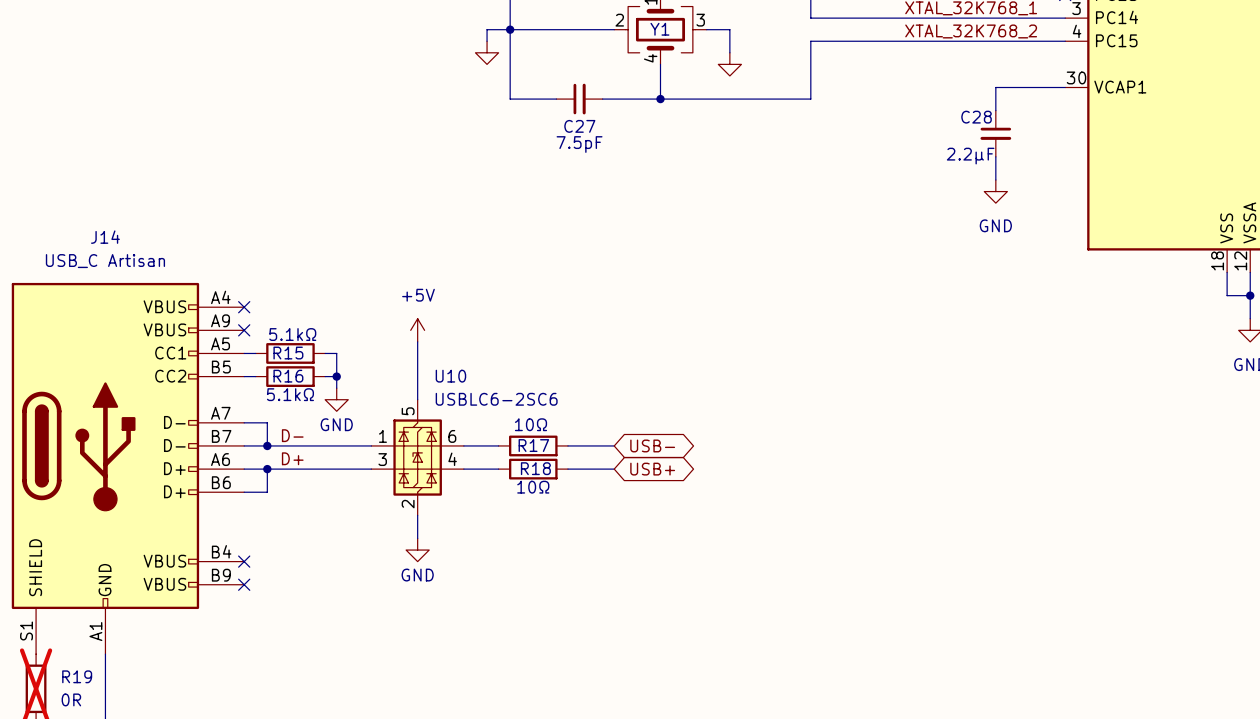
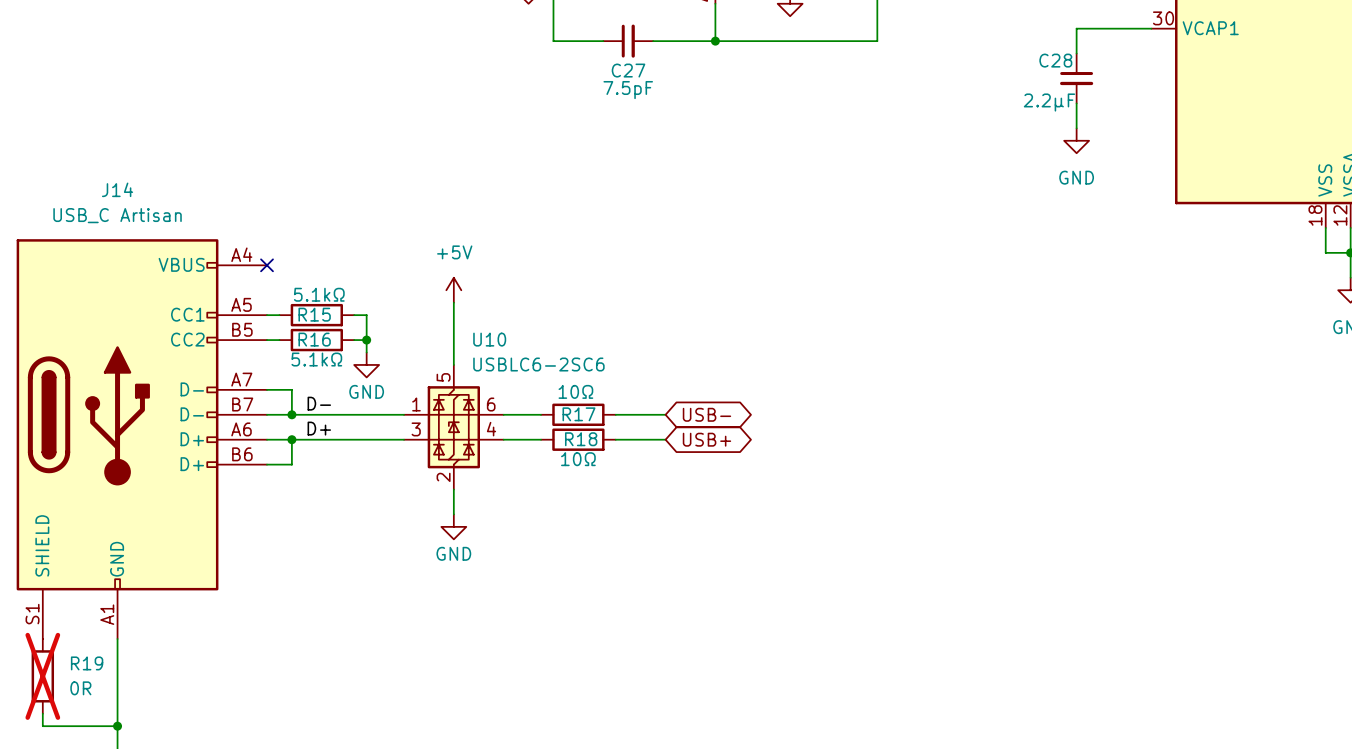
J14 symbol: [11, 282, 245, 655] -> [16, 239, 268, 639]
no-connect mark: (244, 330) -> none
no-connect mark: (244, 561) -> none
no-connect mark: (244, 584) -> none

